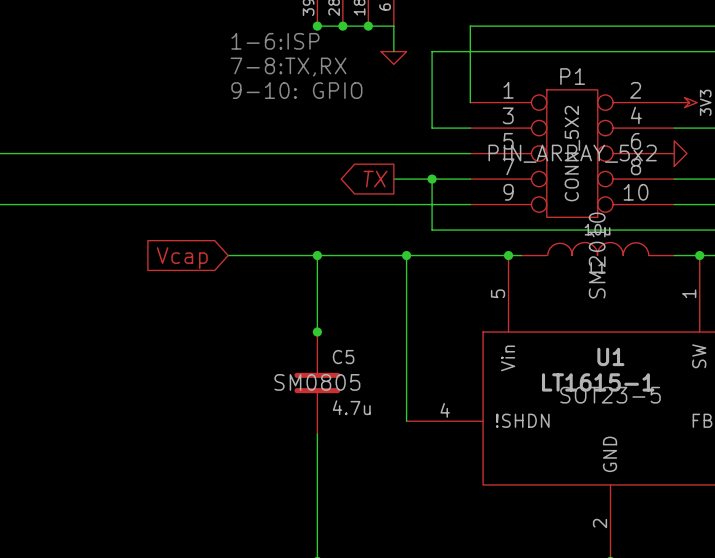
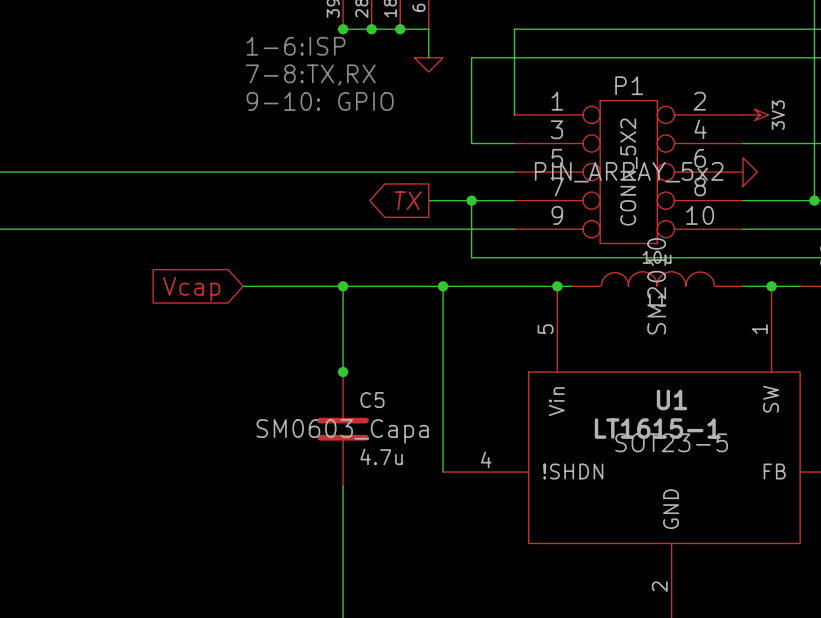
C5 text: SM0805 (317, 382) -> SM0603_Capa (342, 431)

